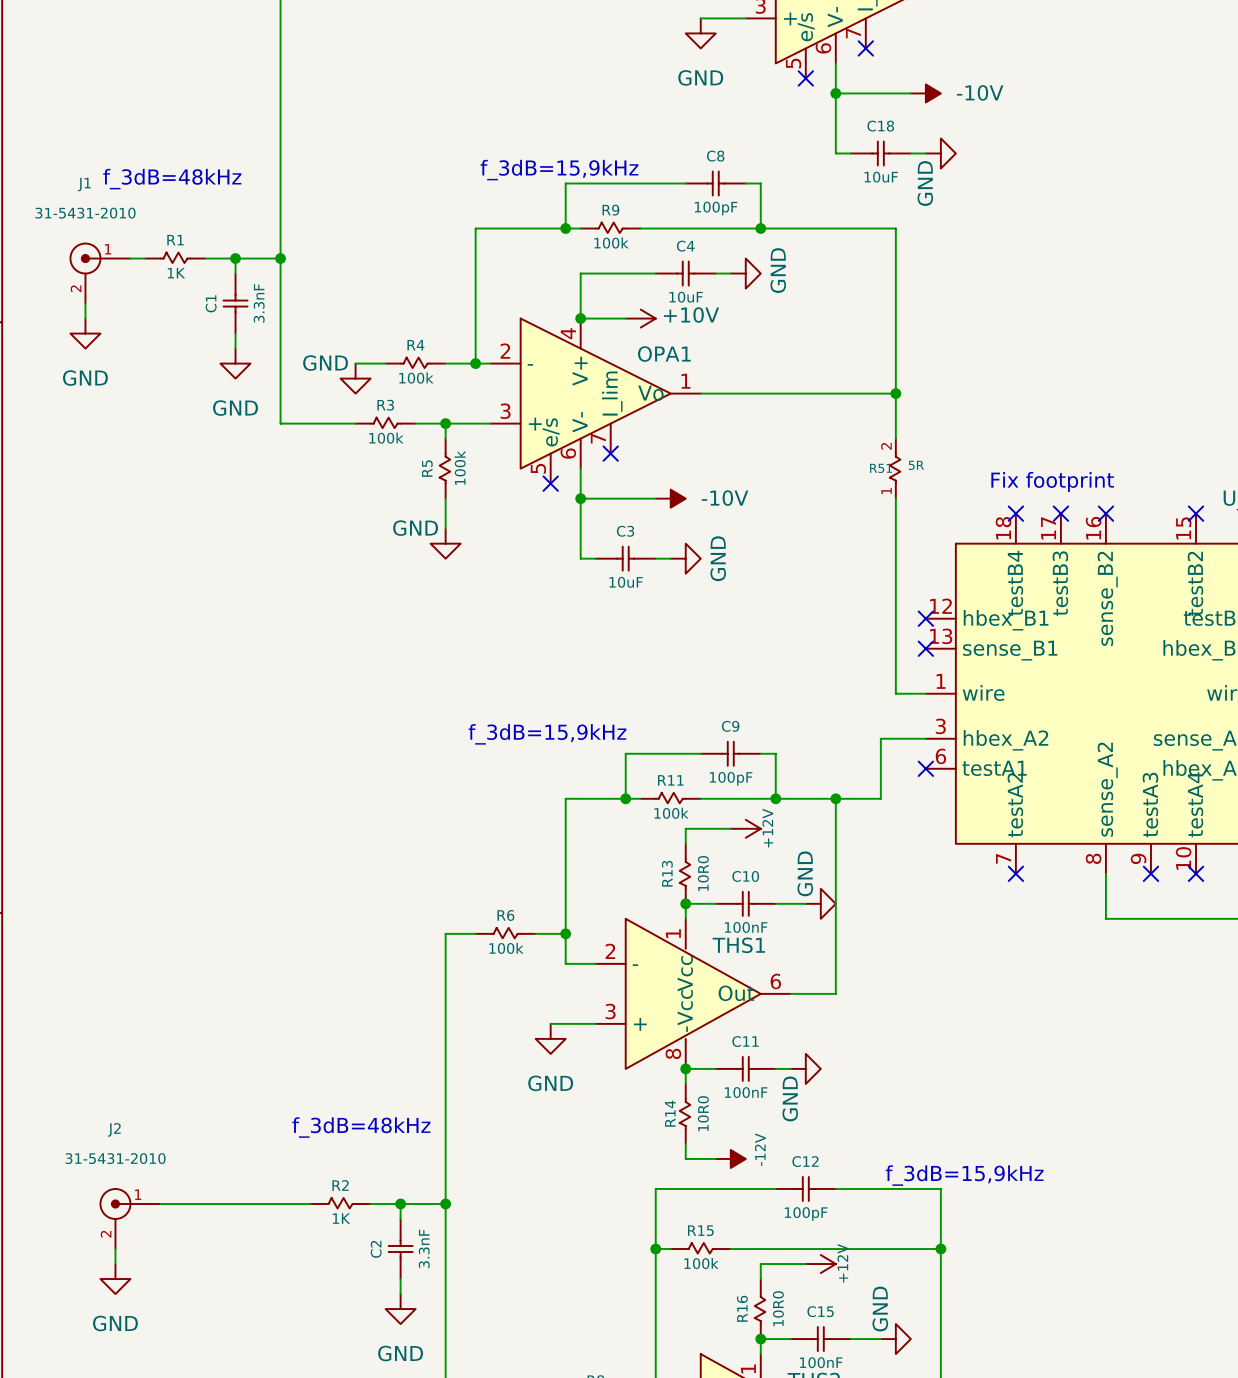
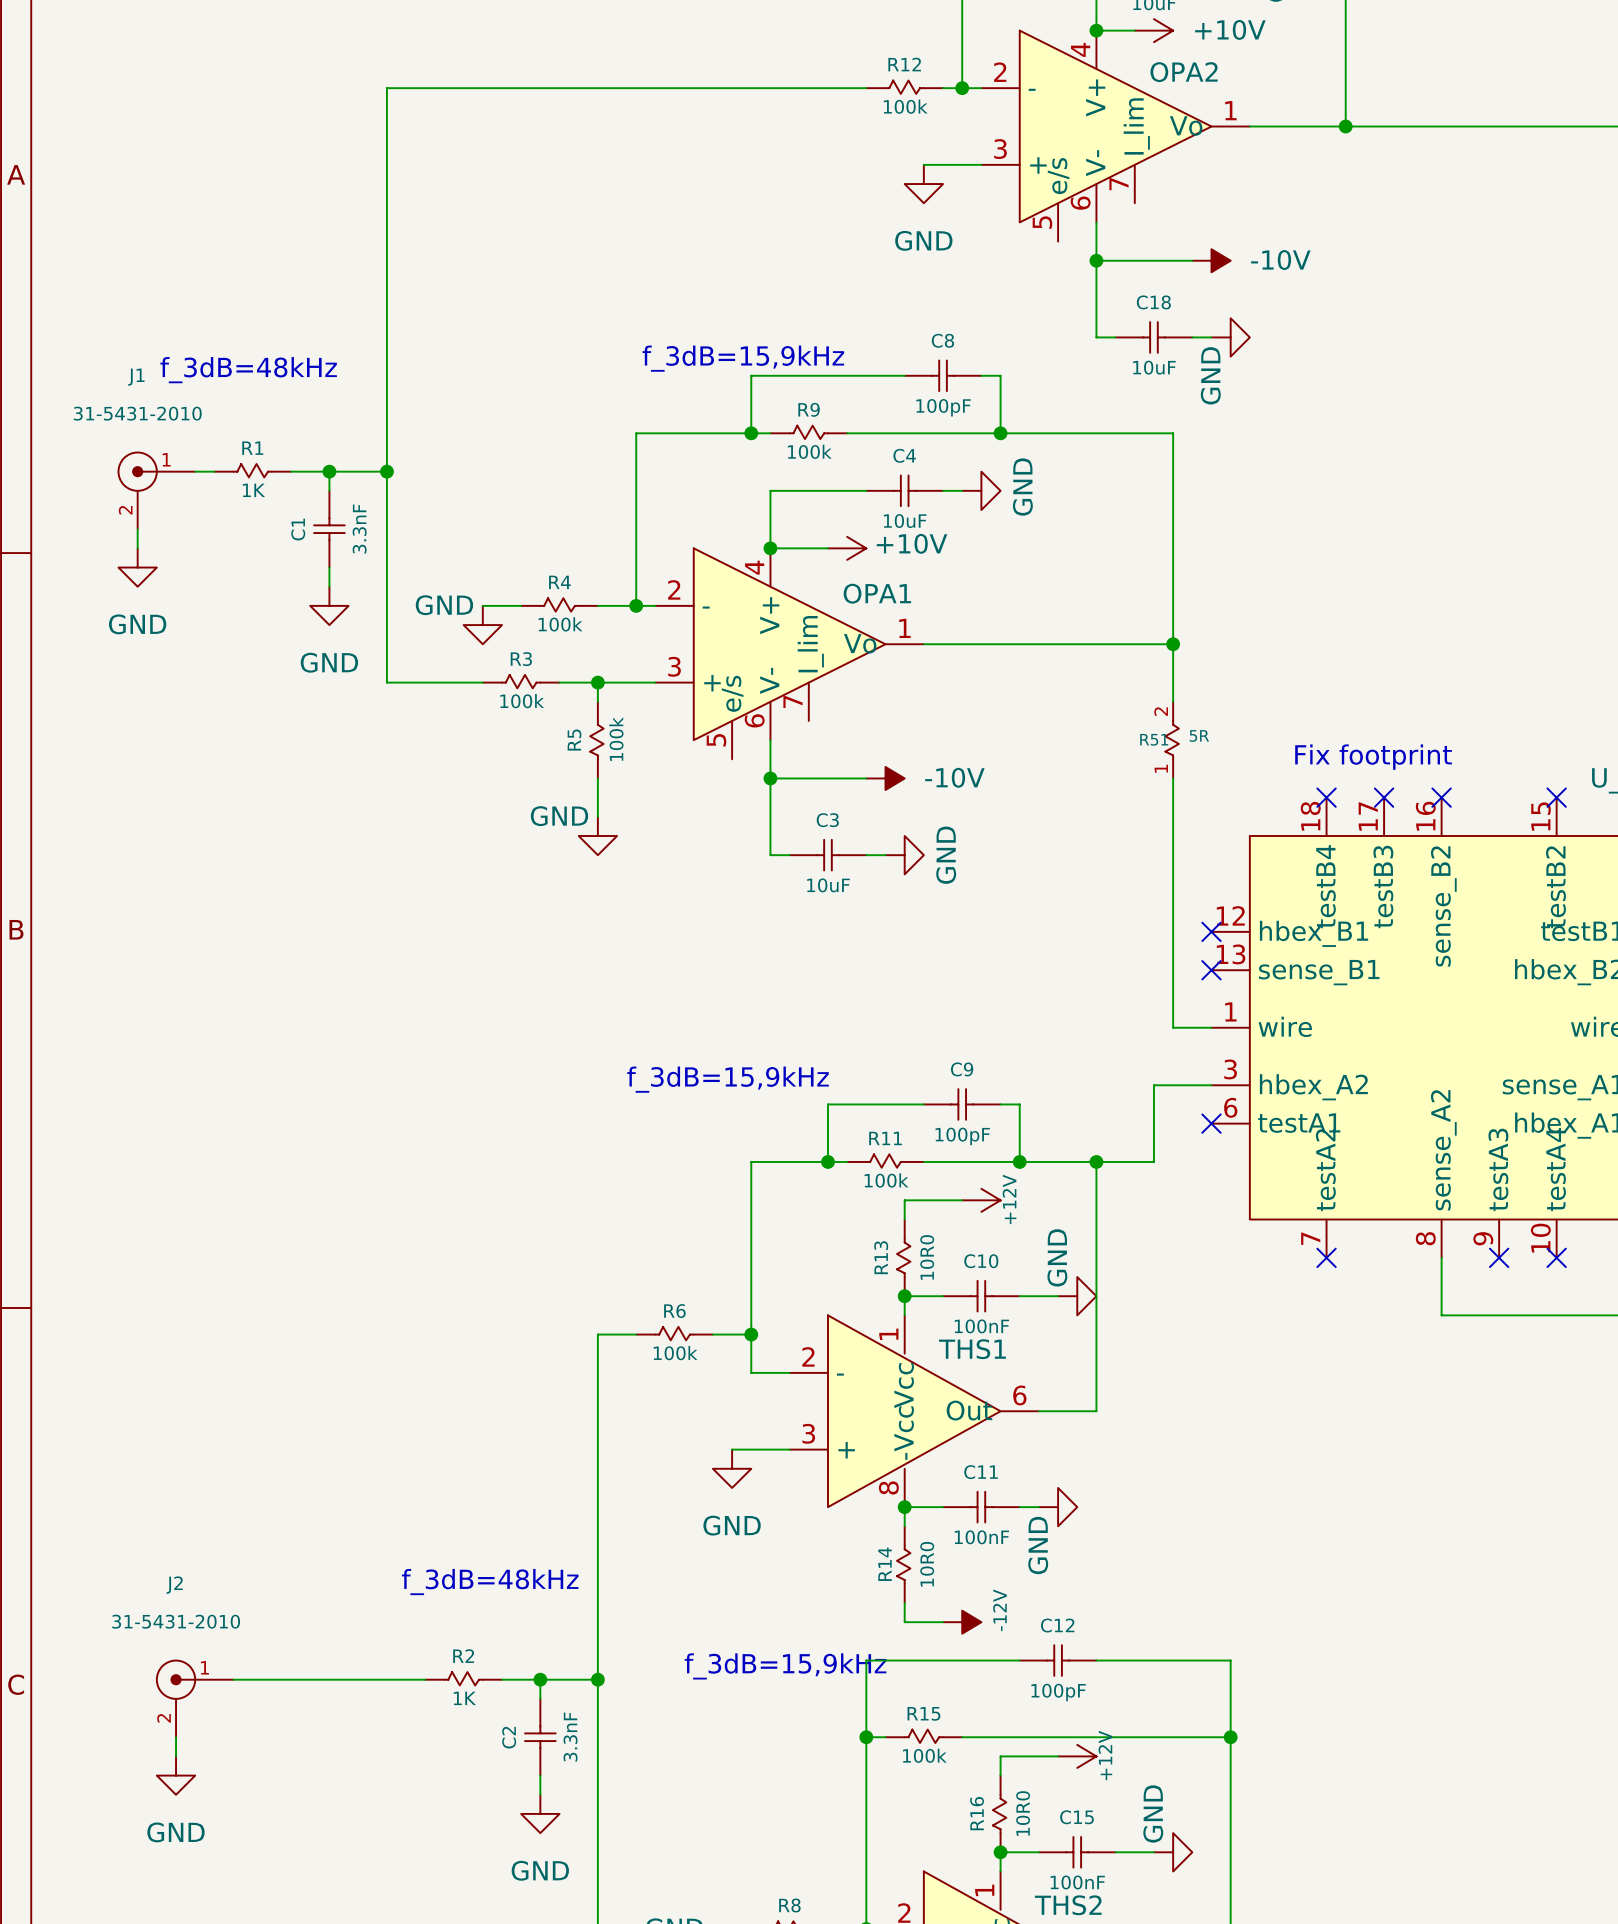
no-connect mark: (865, 48) -> none
no-connect mark: (805, 78) -> none
no-connect mark: (610, 453) -> none
no-connect mark: (550, 483) -> none
text: f_3dB=15,9kHz (964, 1175) -> none
text: none -> f_3dB=15,9kHz (785, 1666)

